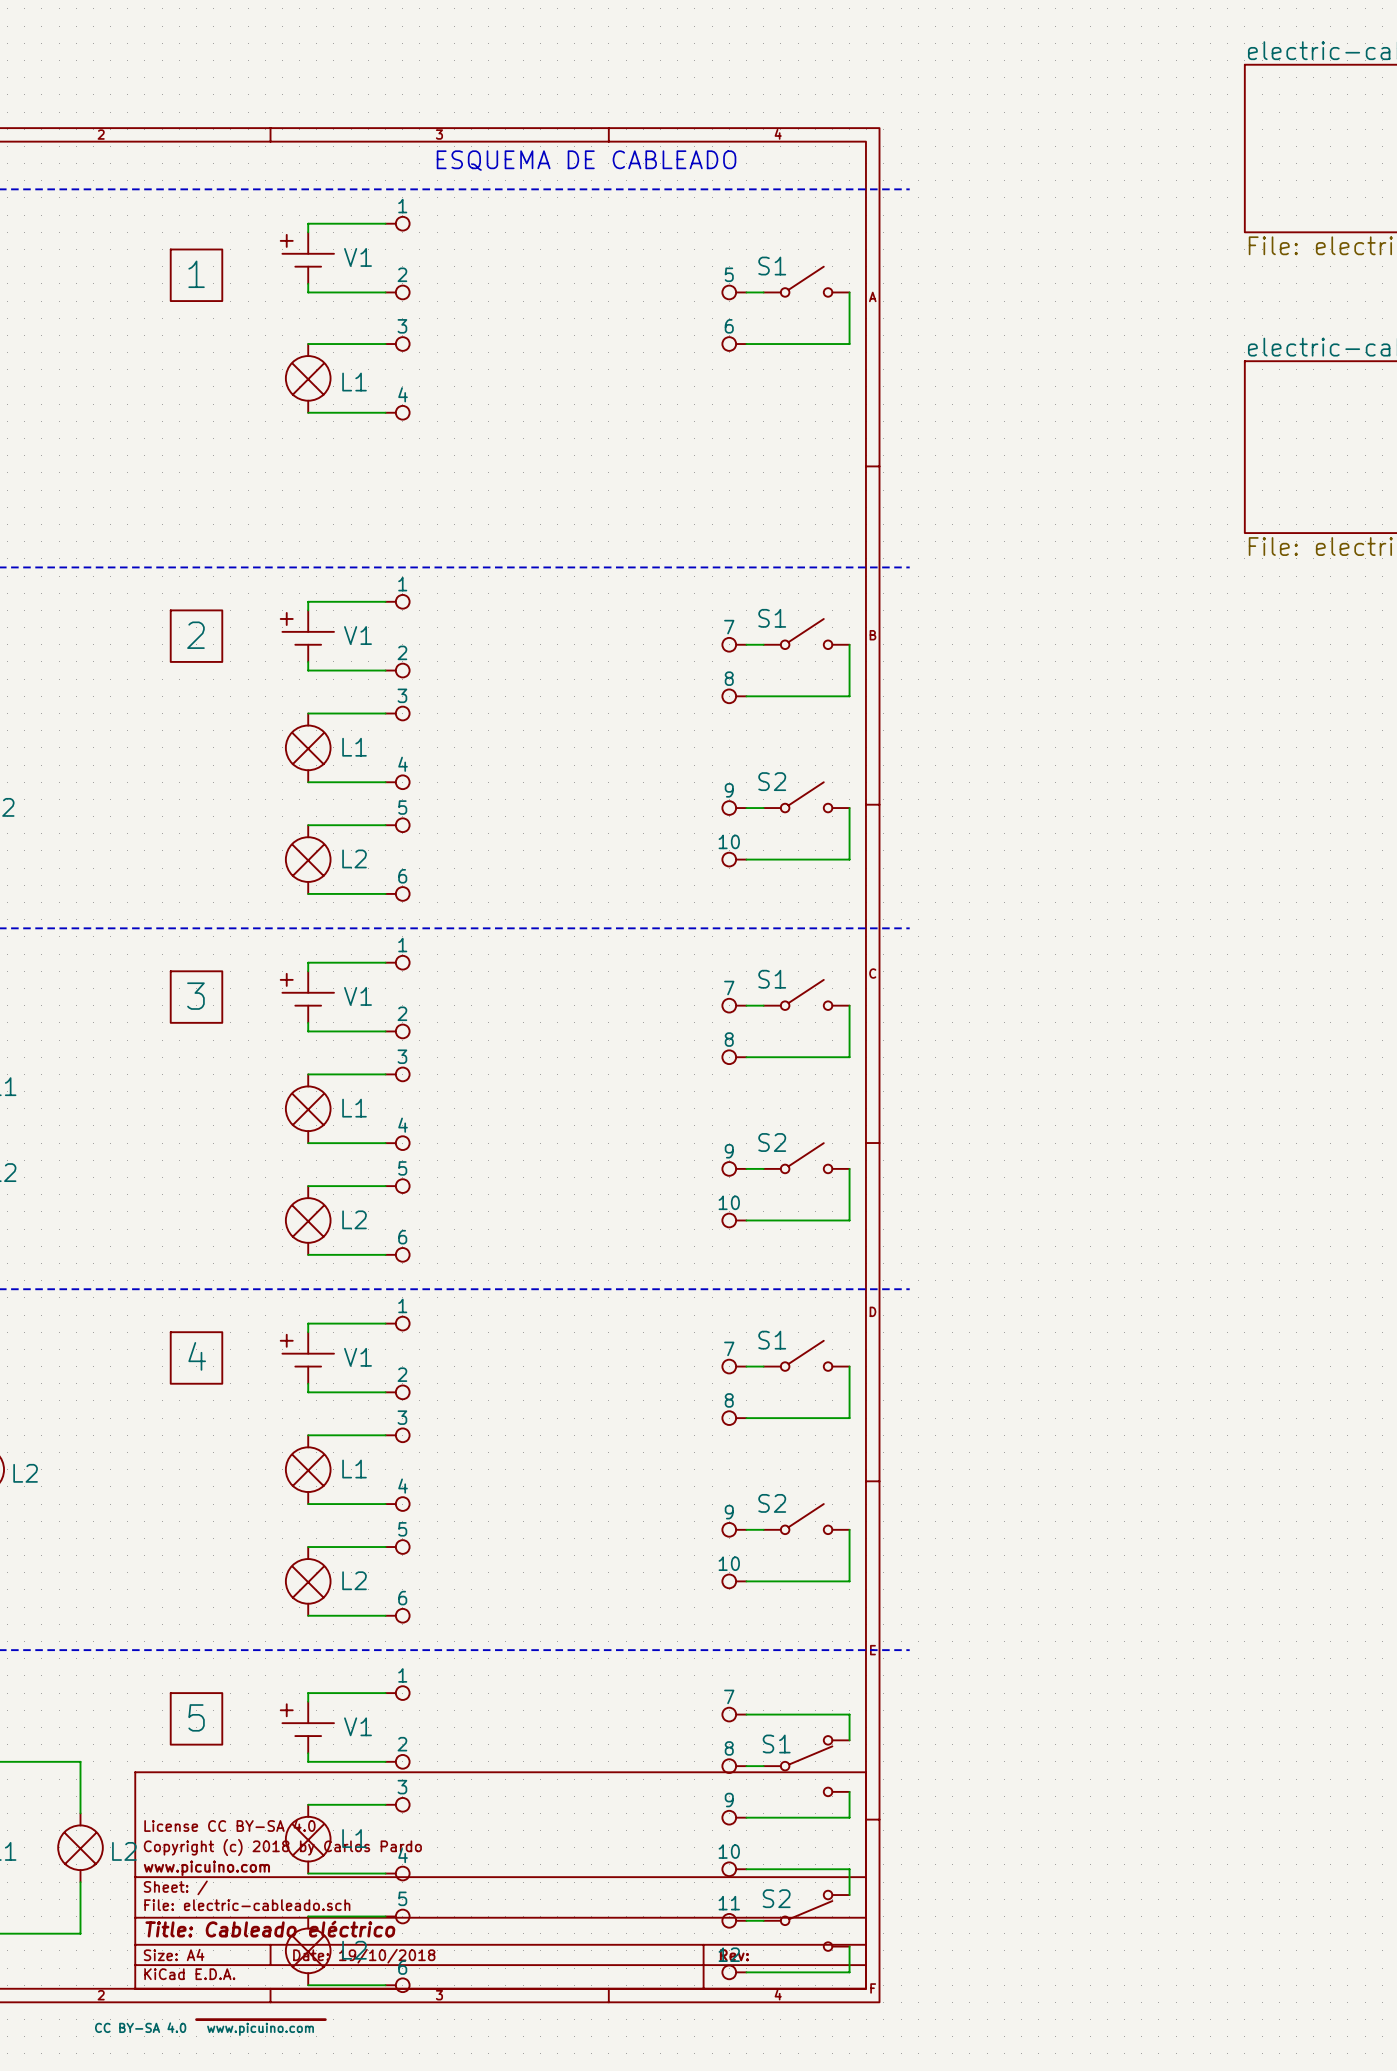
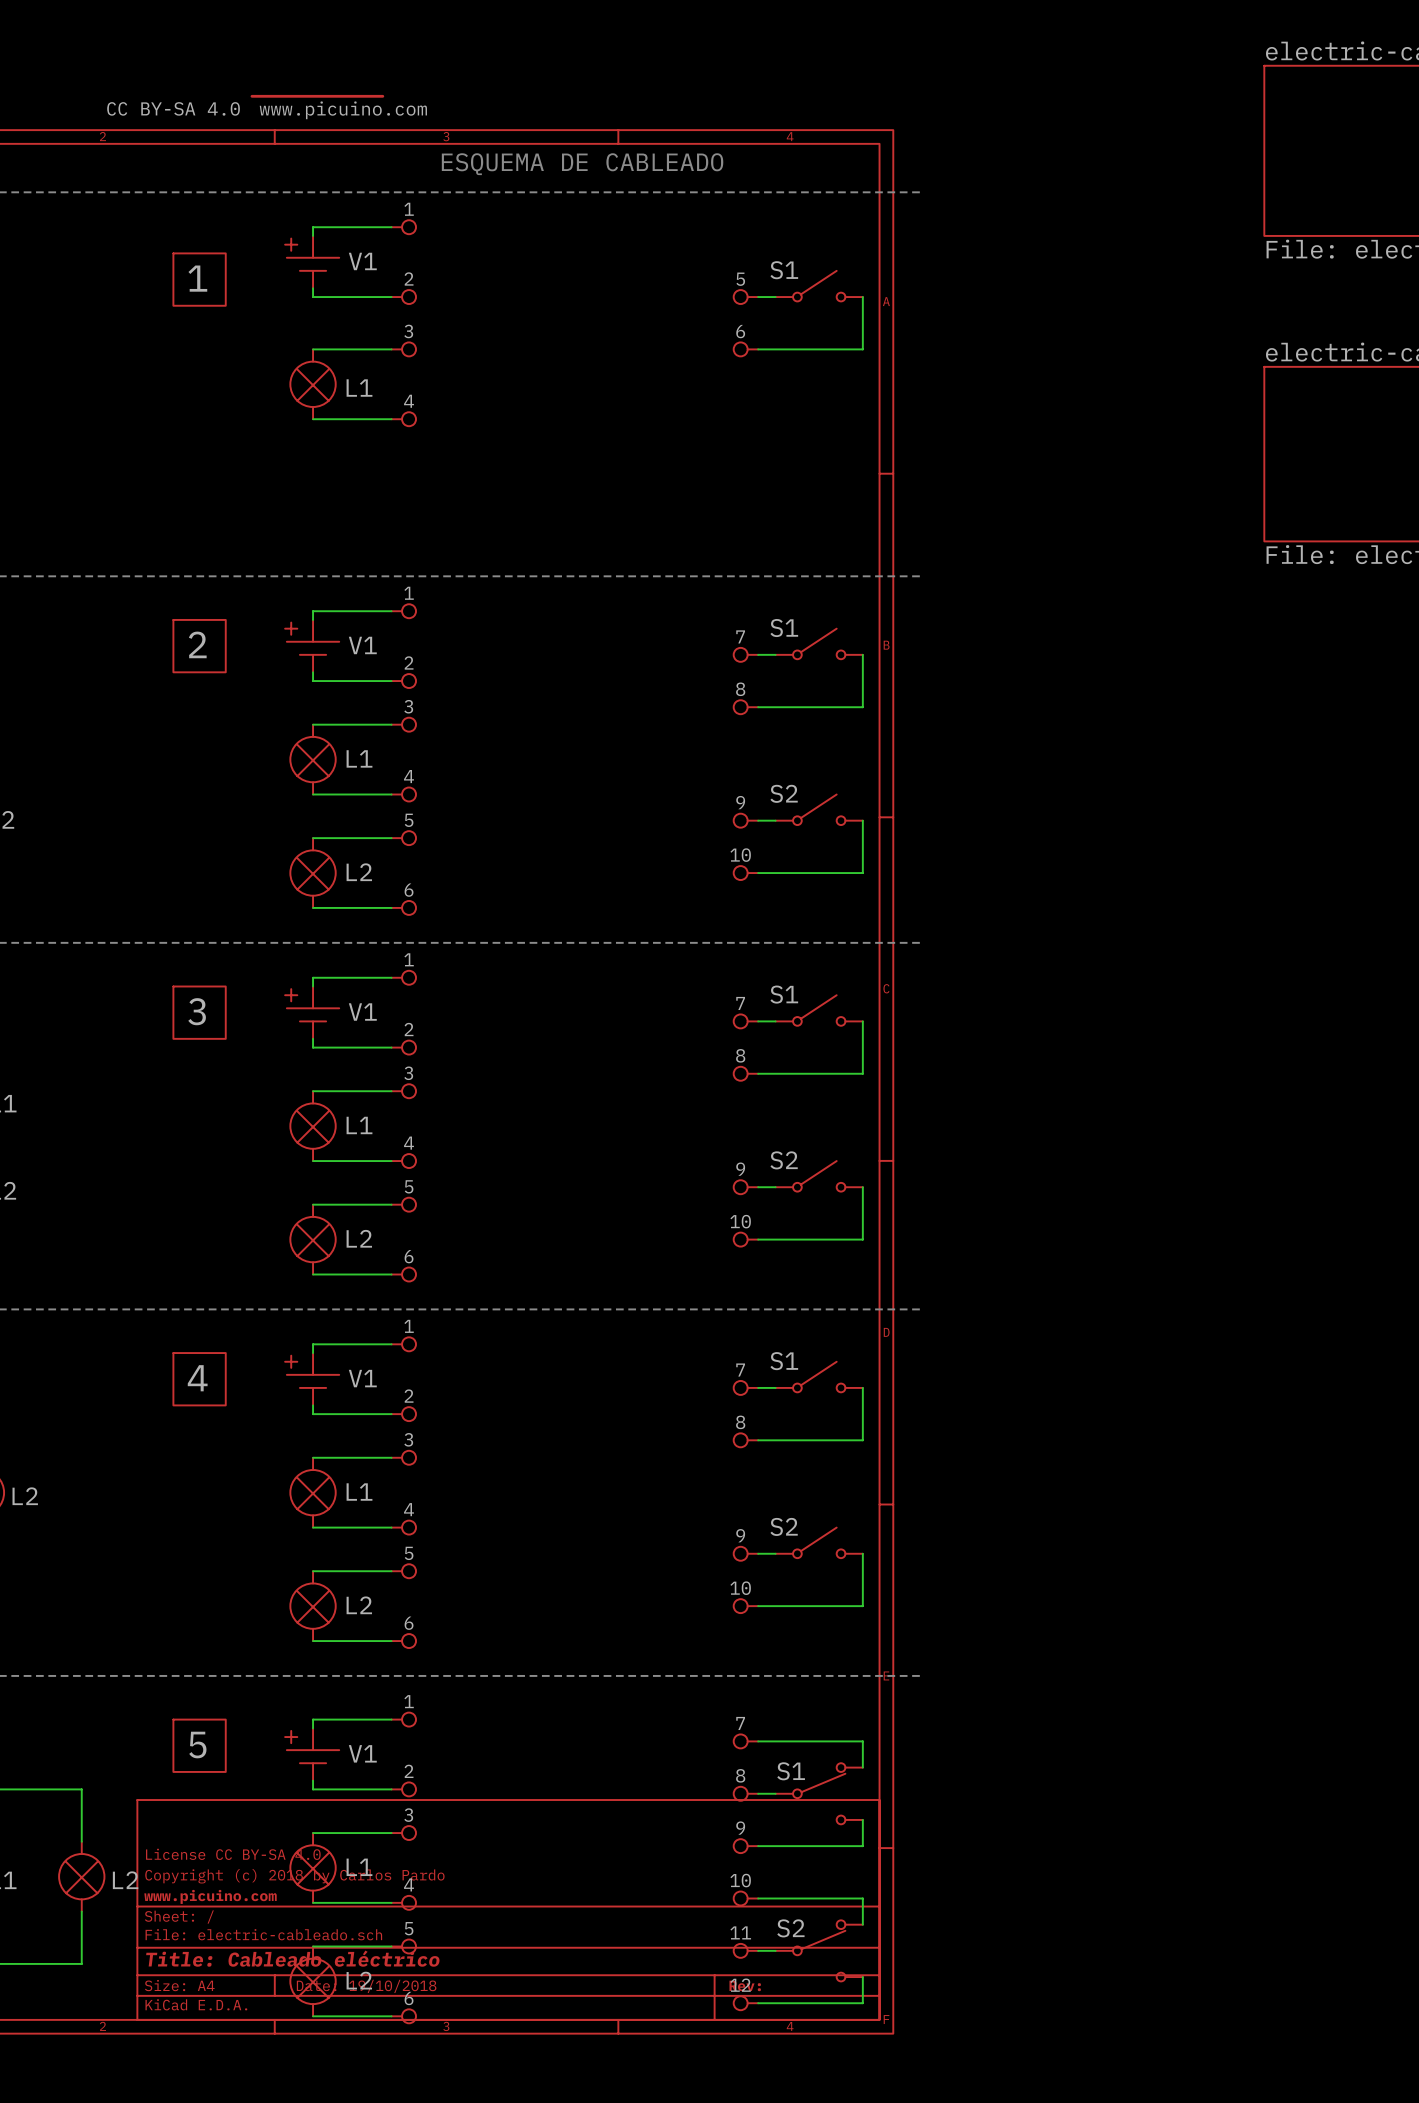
part: none -> (317, 96)
part: (260, 2019) -> none

